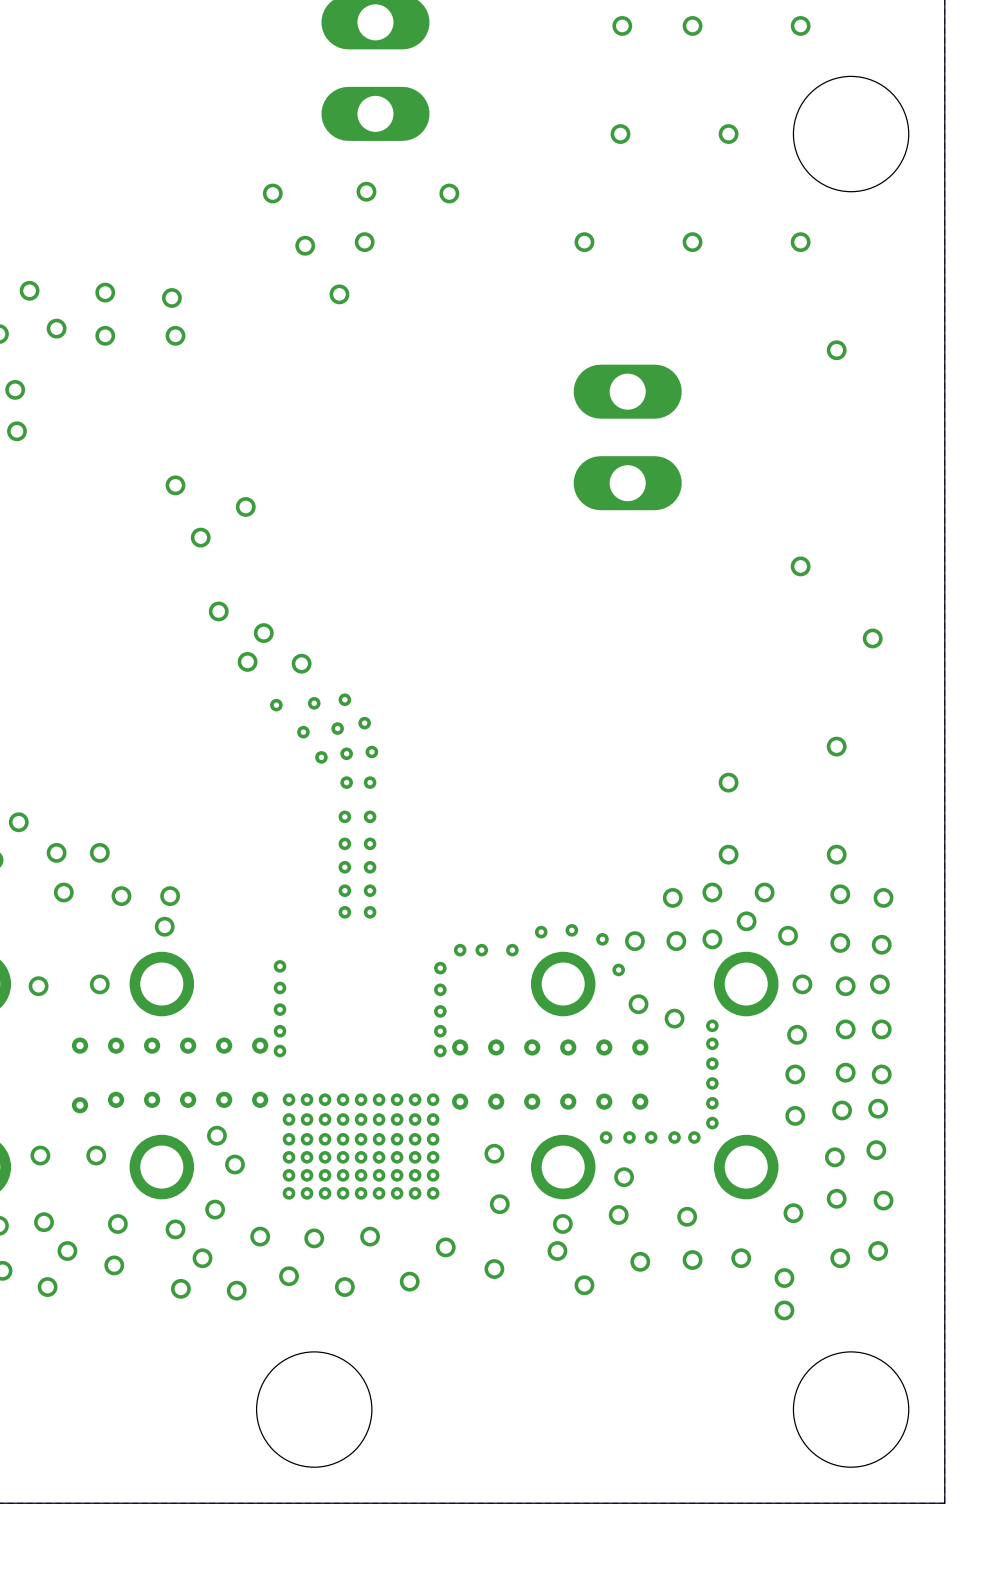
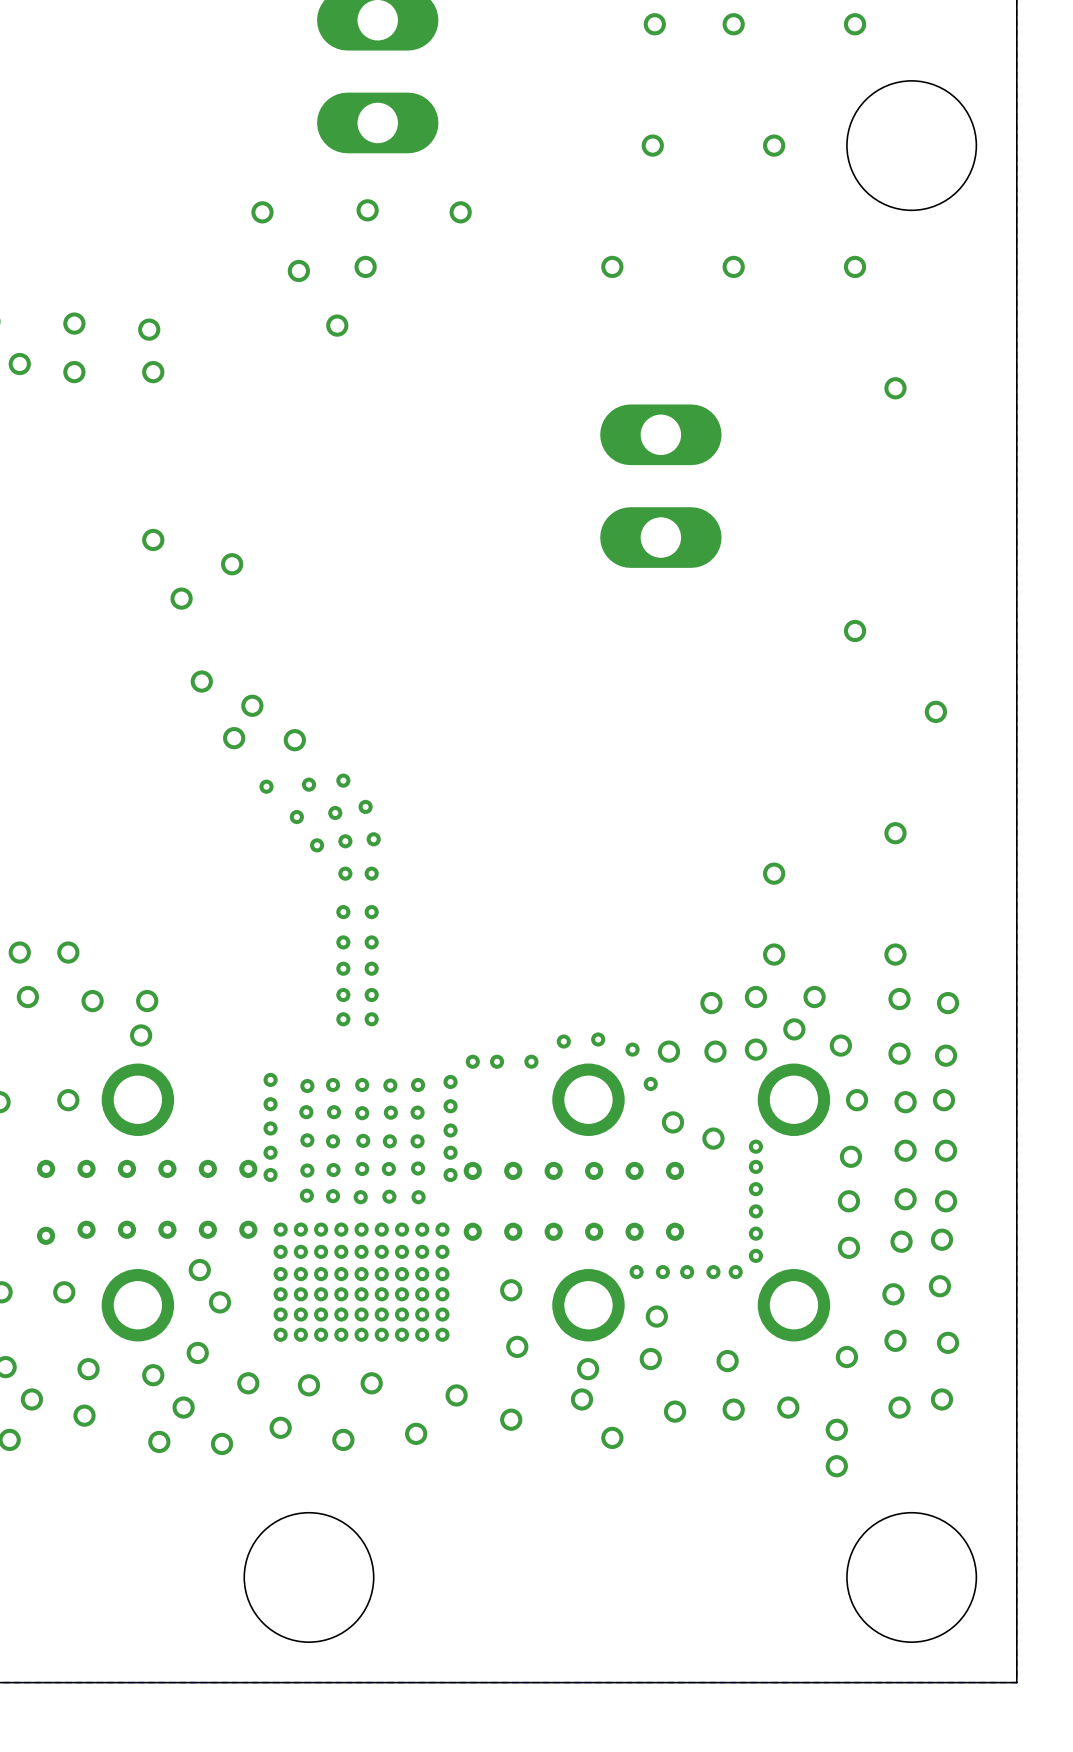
via: none -> (333, 1085)
via: none -> (362, 1085)
via: none -> (418, 1085)
via: none -> (307, 1086)
via: none -> (390, 1085)
via: none -> (306, 1112)
via: none -> (334, 1112)
via: none -> (362, 1113)
via: none -> (390, 1112)
via: none -> (417, 1112)
via: none -> (307, 1140)
via: none -> (363, 1140)
via: none -> (333, 1141)
via: none -> (389, 1141)
via: none -> (417, 1141)
via: none -> (362, 1169)
via: none -> (388, 1169)
via: none -> (418, 1168)
via: none -> (333, 1170)
via: none -> (307, 1170)
via: none -> (306, 1195)
via: none -> (333, 1196)
via: none -> (360, 1197)
via: none -> (389, 1196)
via: none -> (418, 1197)

